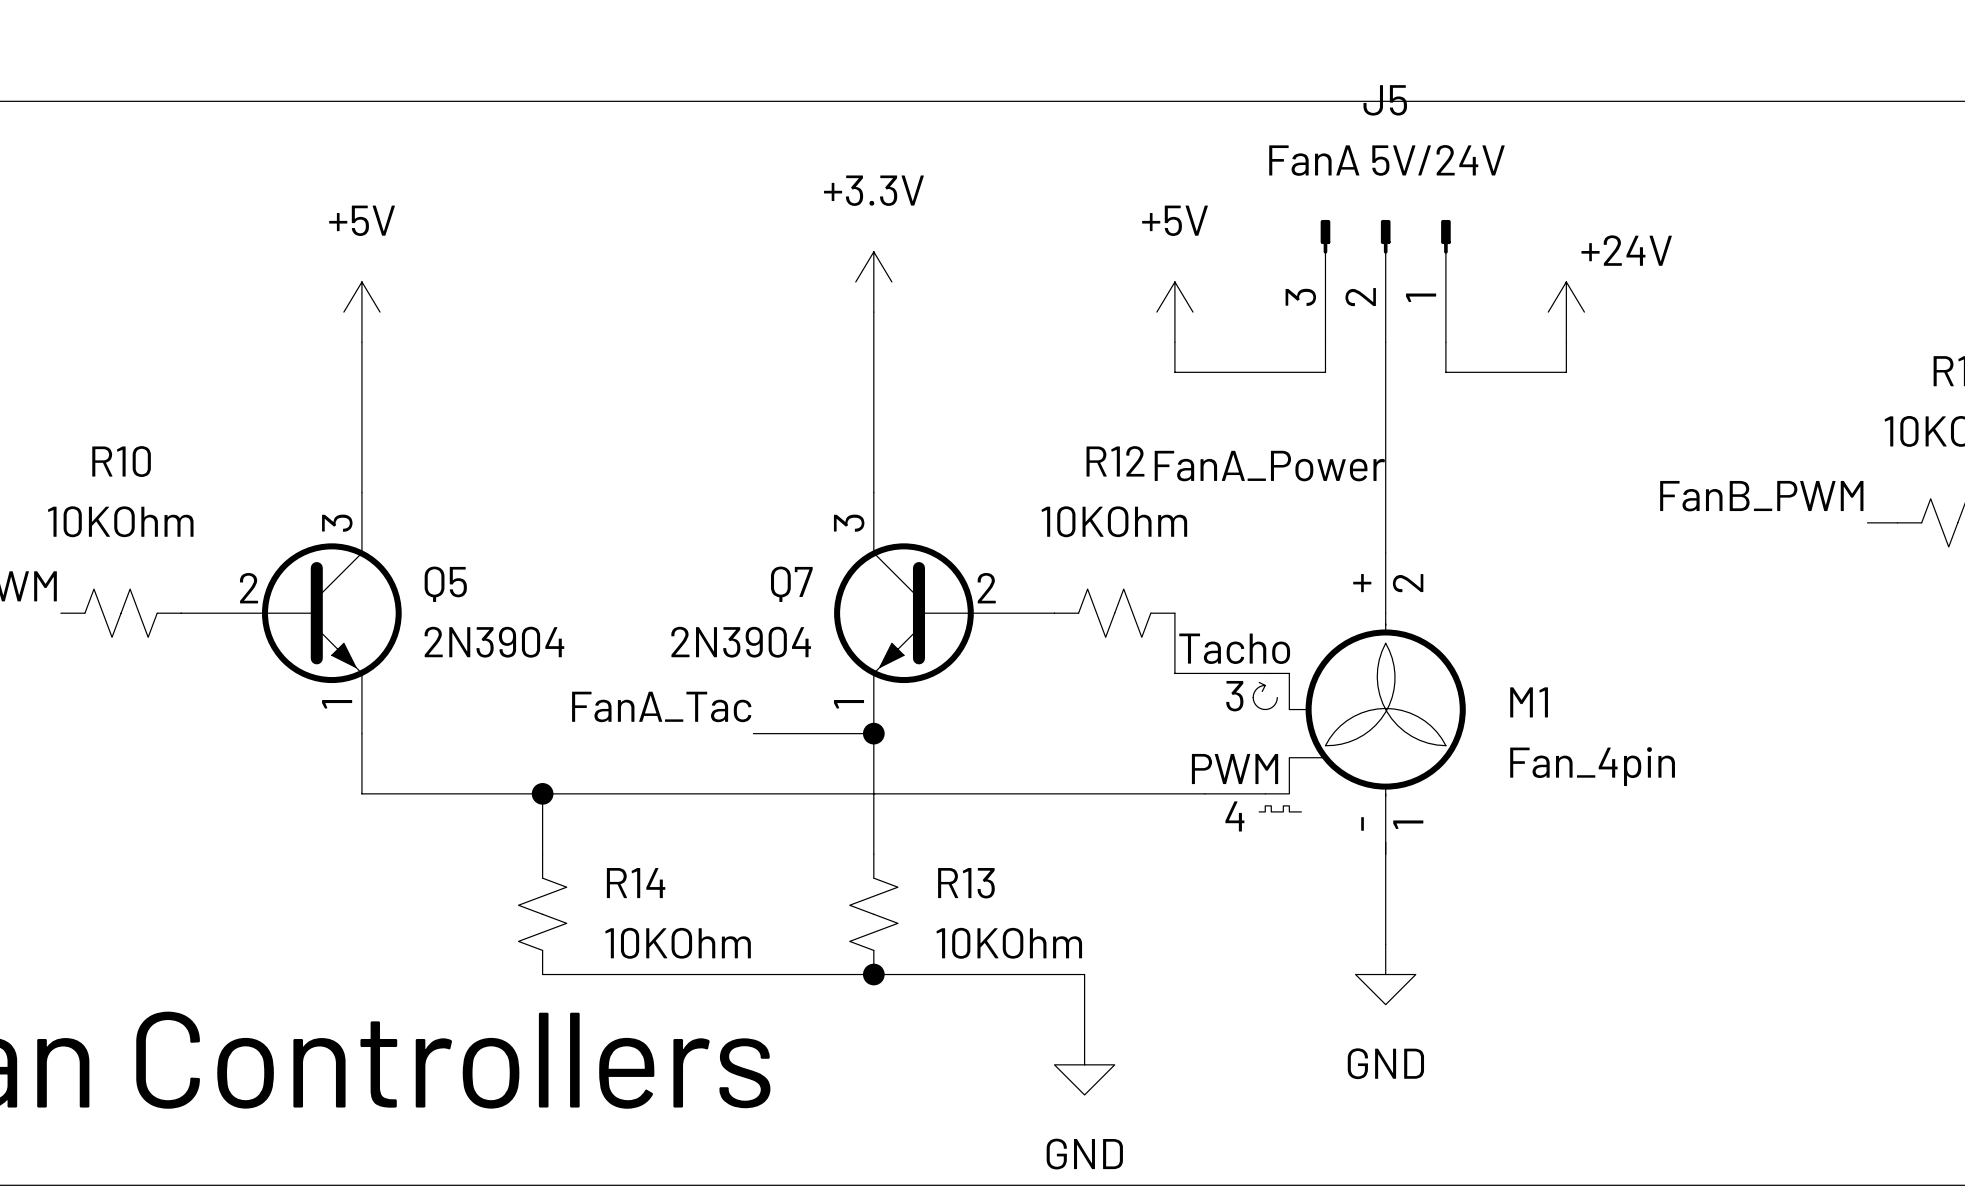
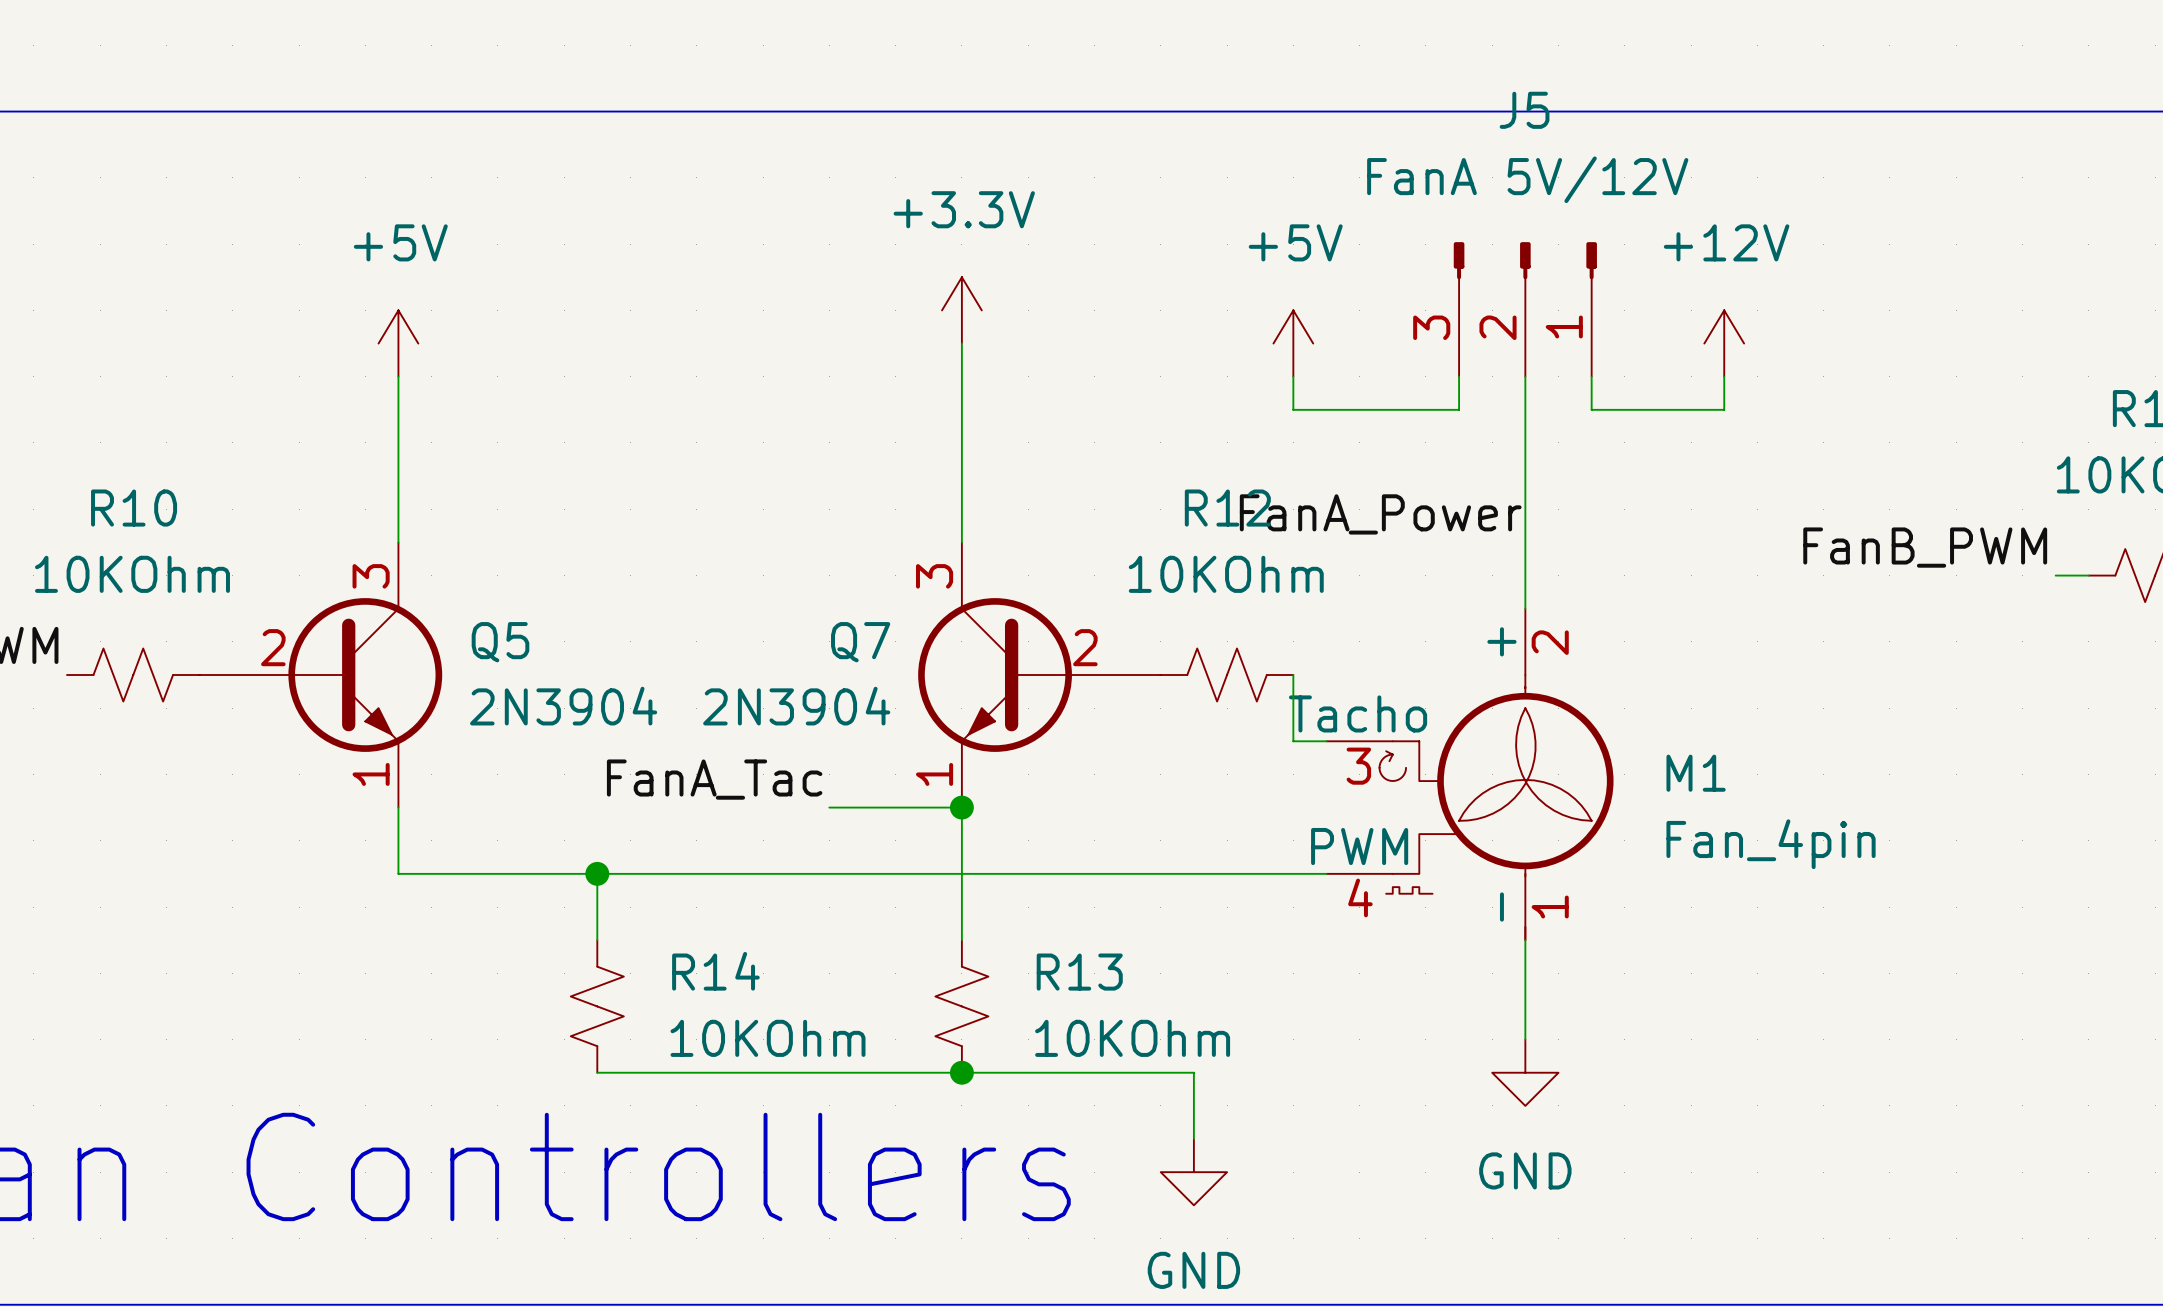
J5 value: FanA 5V/24V (1387, 160) -> FanA 5V/12V (1527, 179)
power symbol: +24V (1566, 312) -> +12V (1724, 343)

